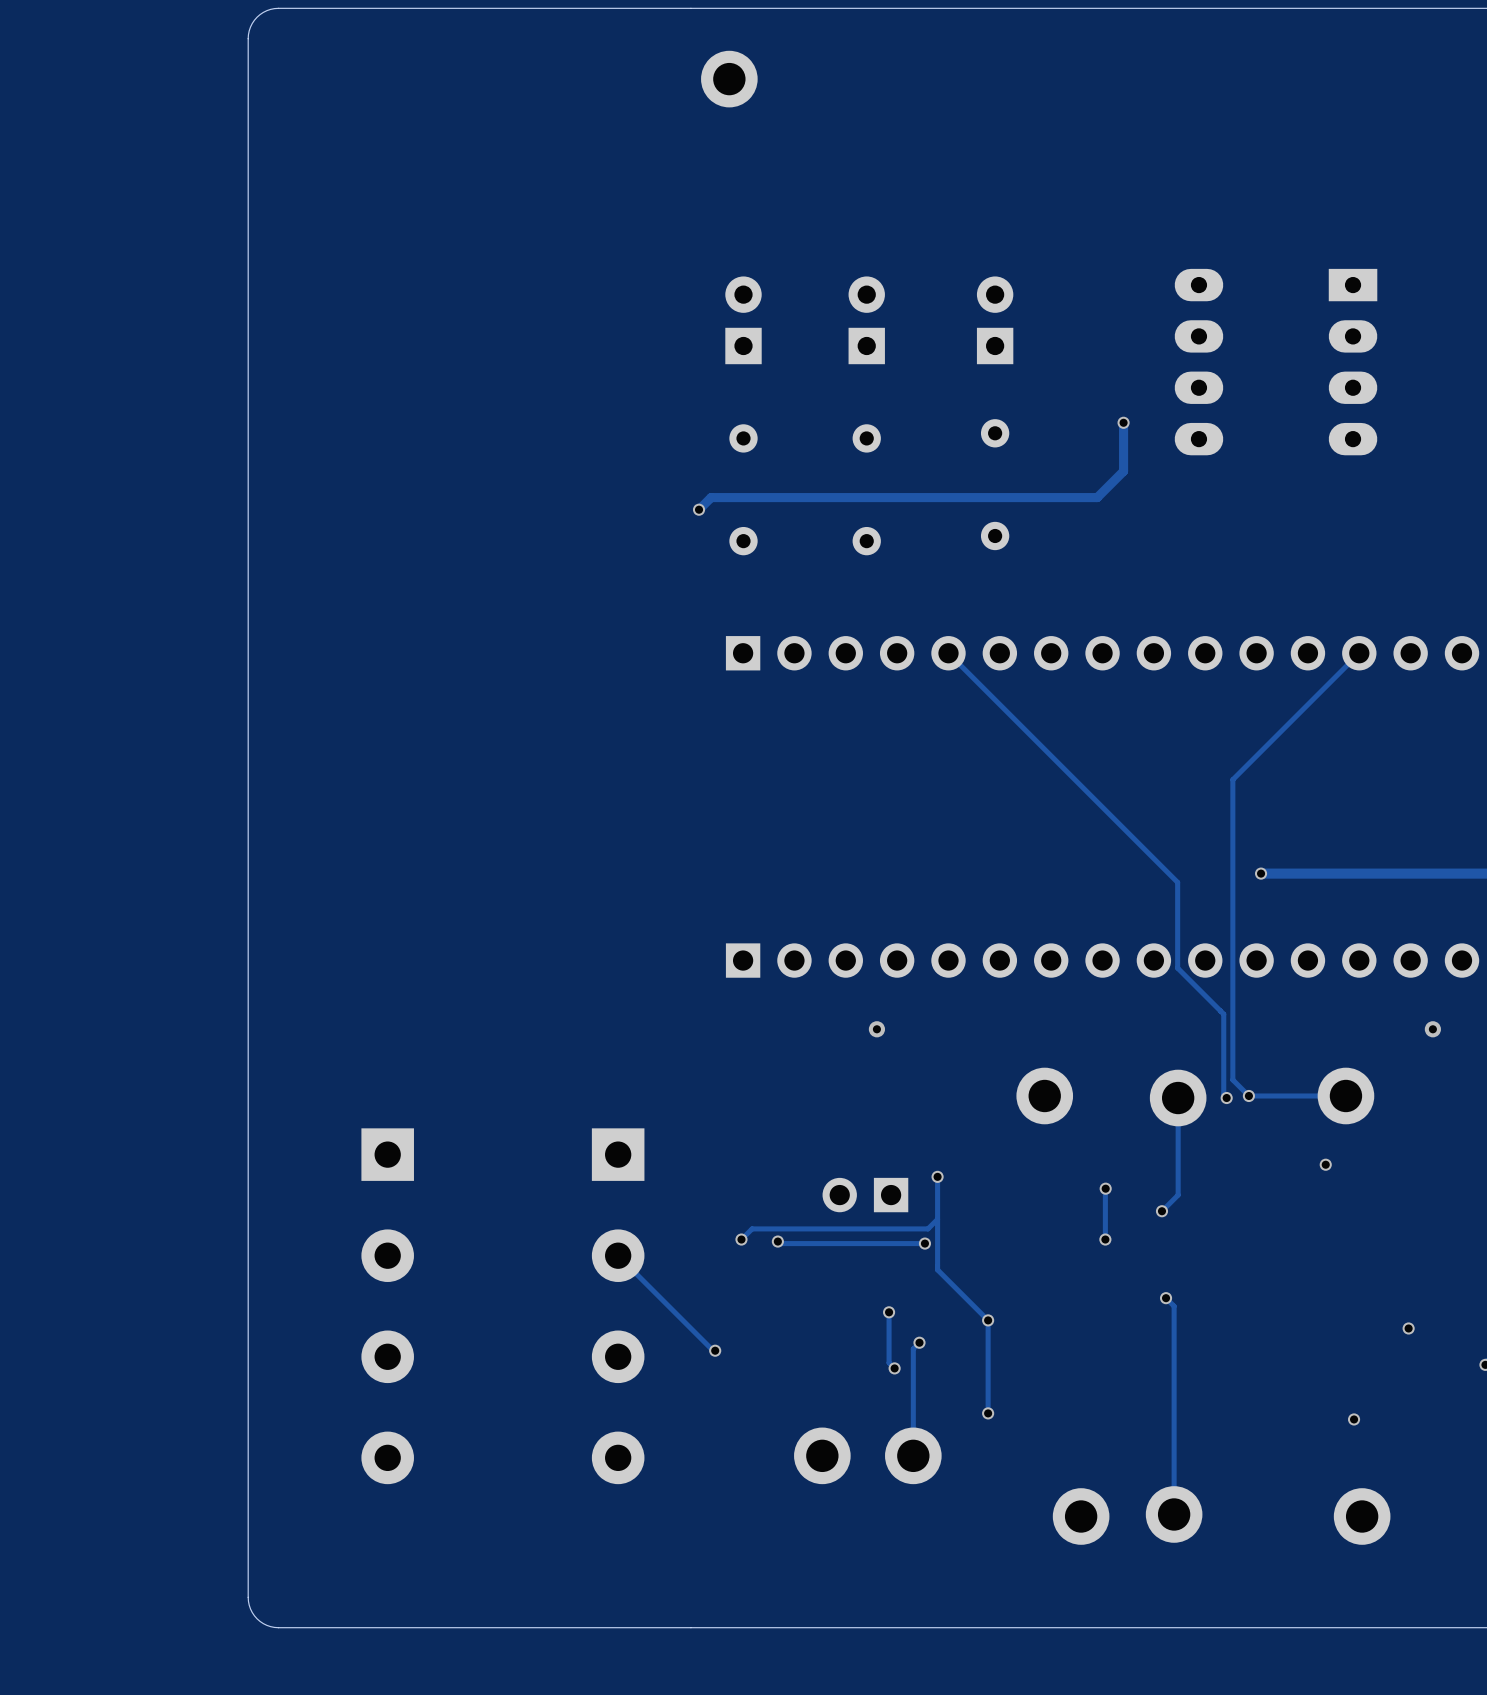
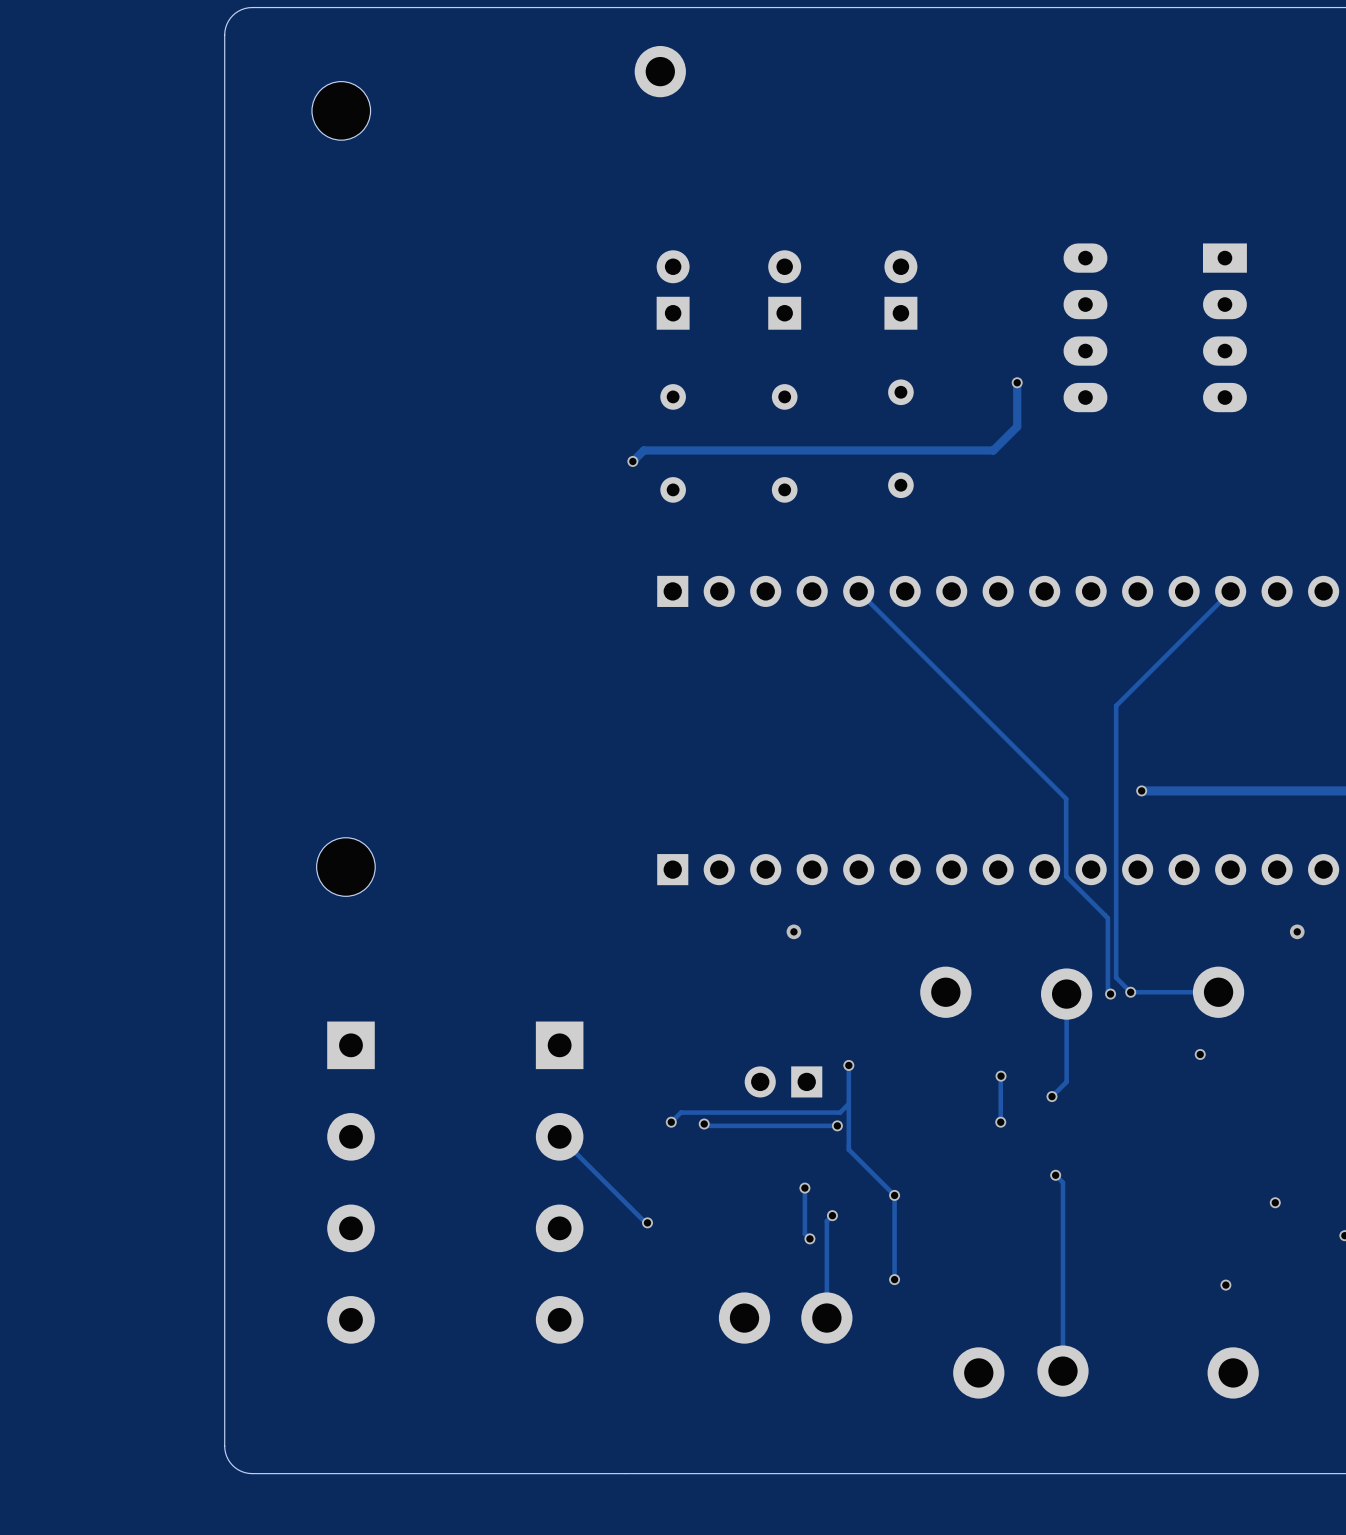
part: none -> (341, 110)
part: none -> (345, 867)

